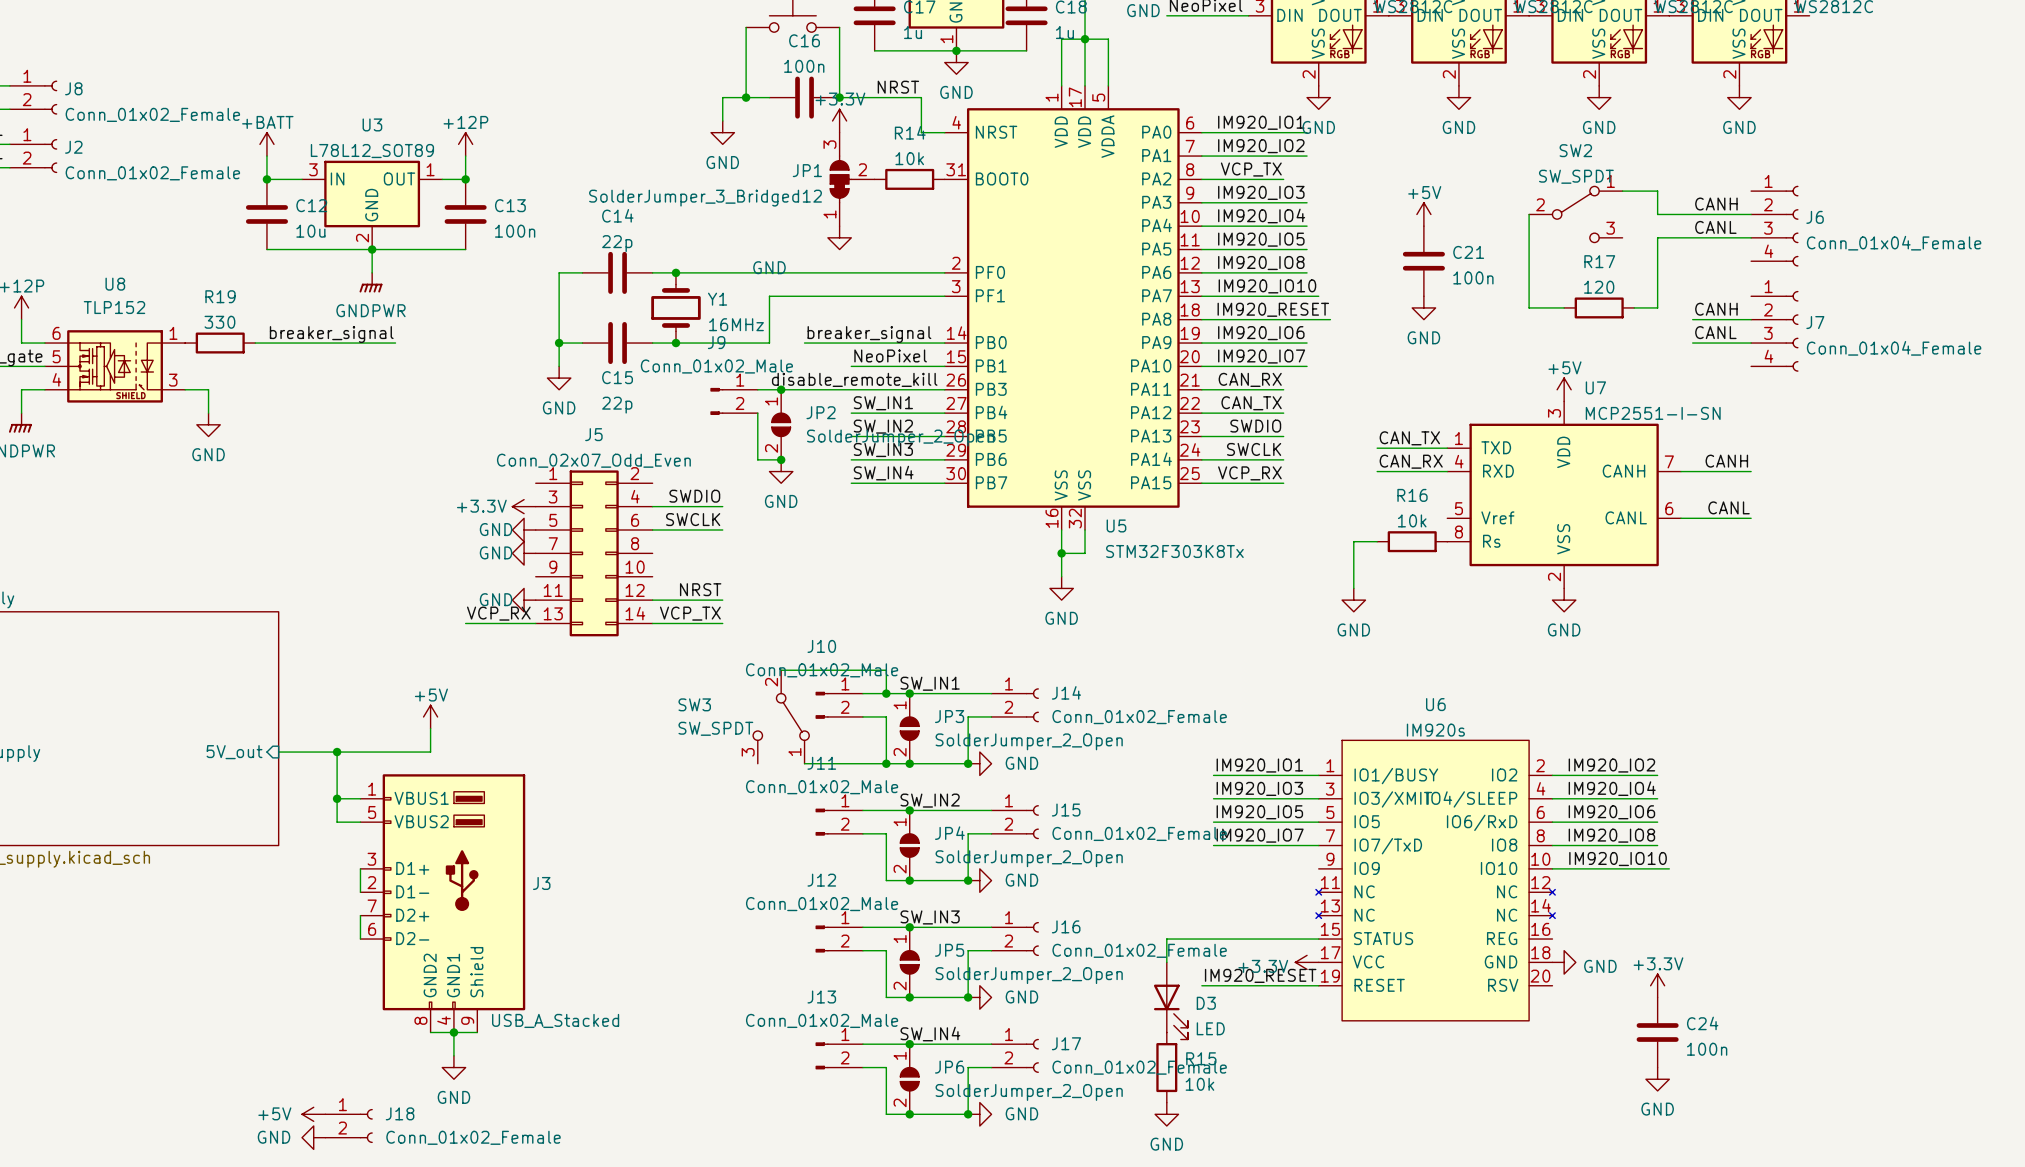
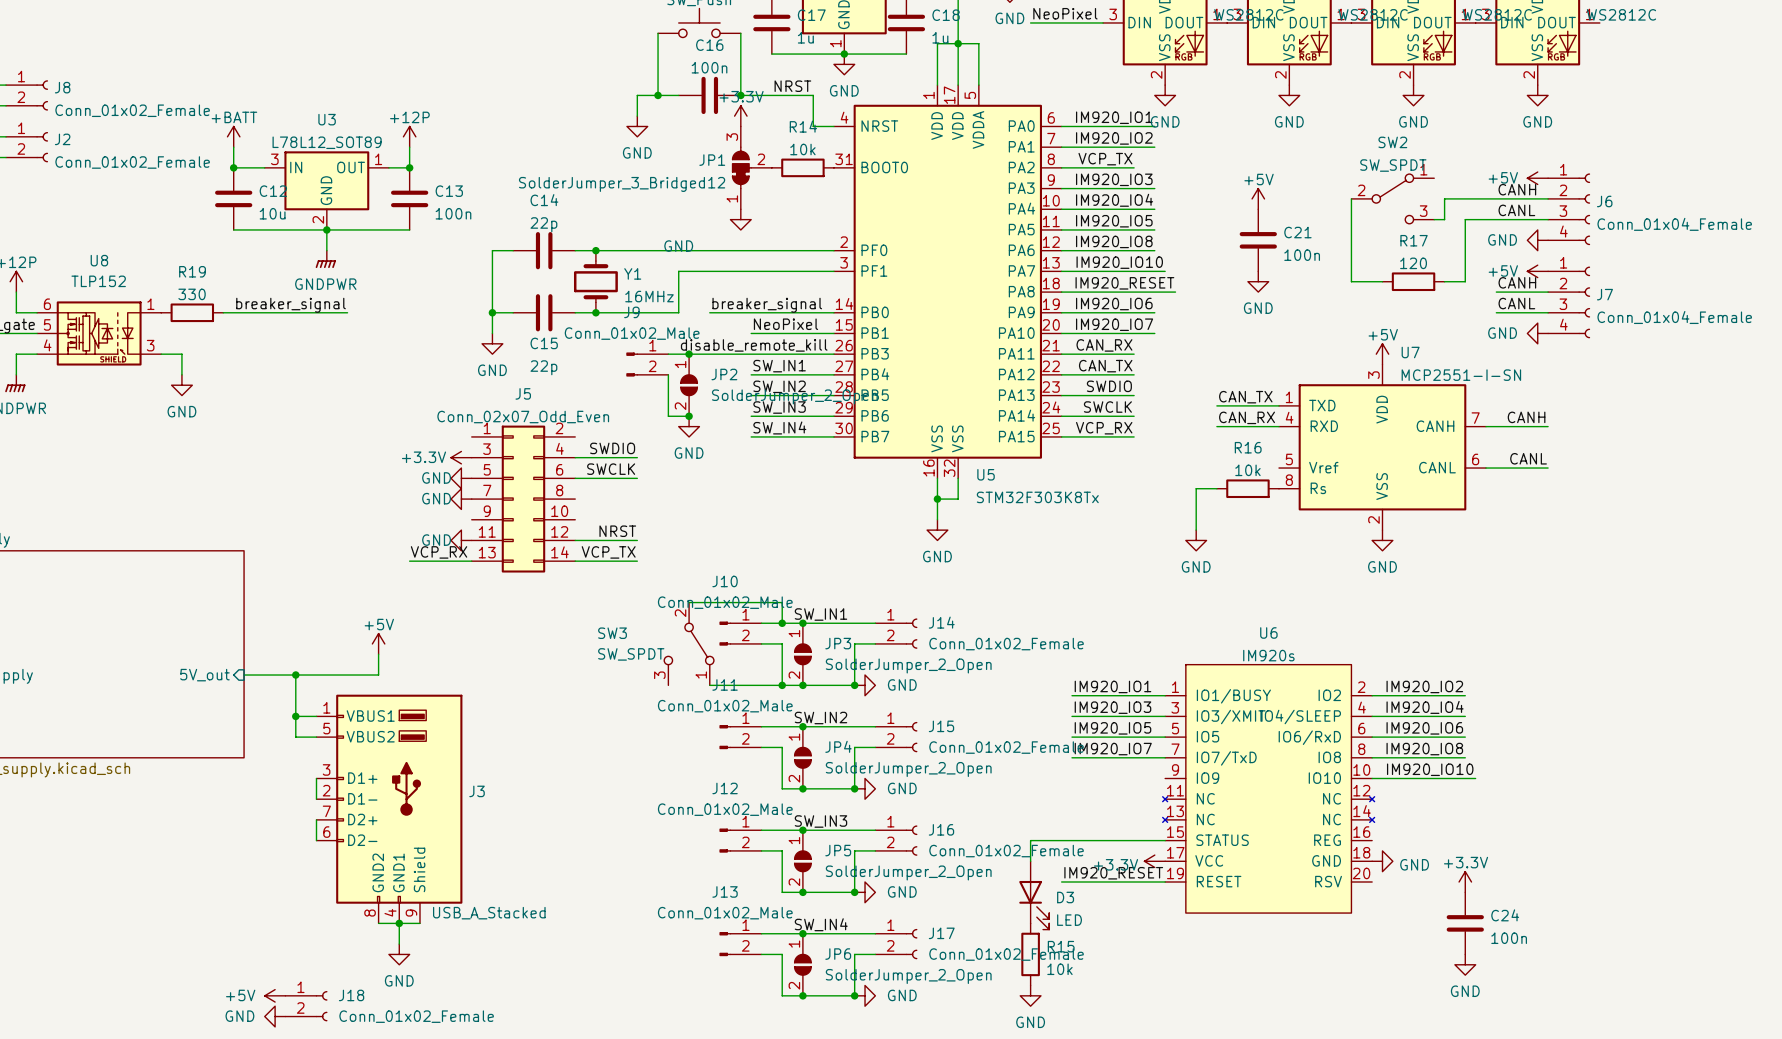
wire: (1622, 191) (1657, 191) (1657, 214) -> (1434, 219) (1444, 219) (1444, 198) (1465, 198)
power symbol: none -> +5V (1537, 178)
power symbol: none -> GND (1537, 240)
power symbol: none -> +5V (1537, 271)
power symbol: none -> GND (1537, 333)

